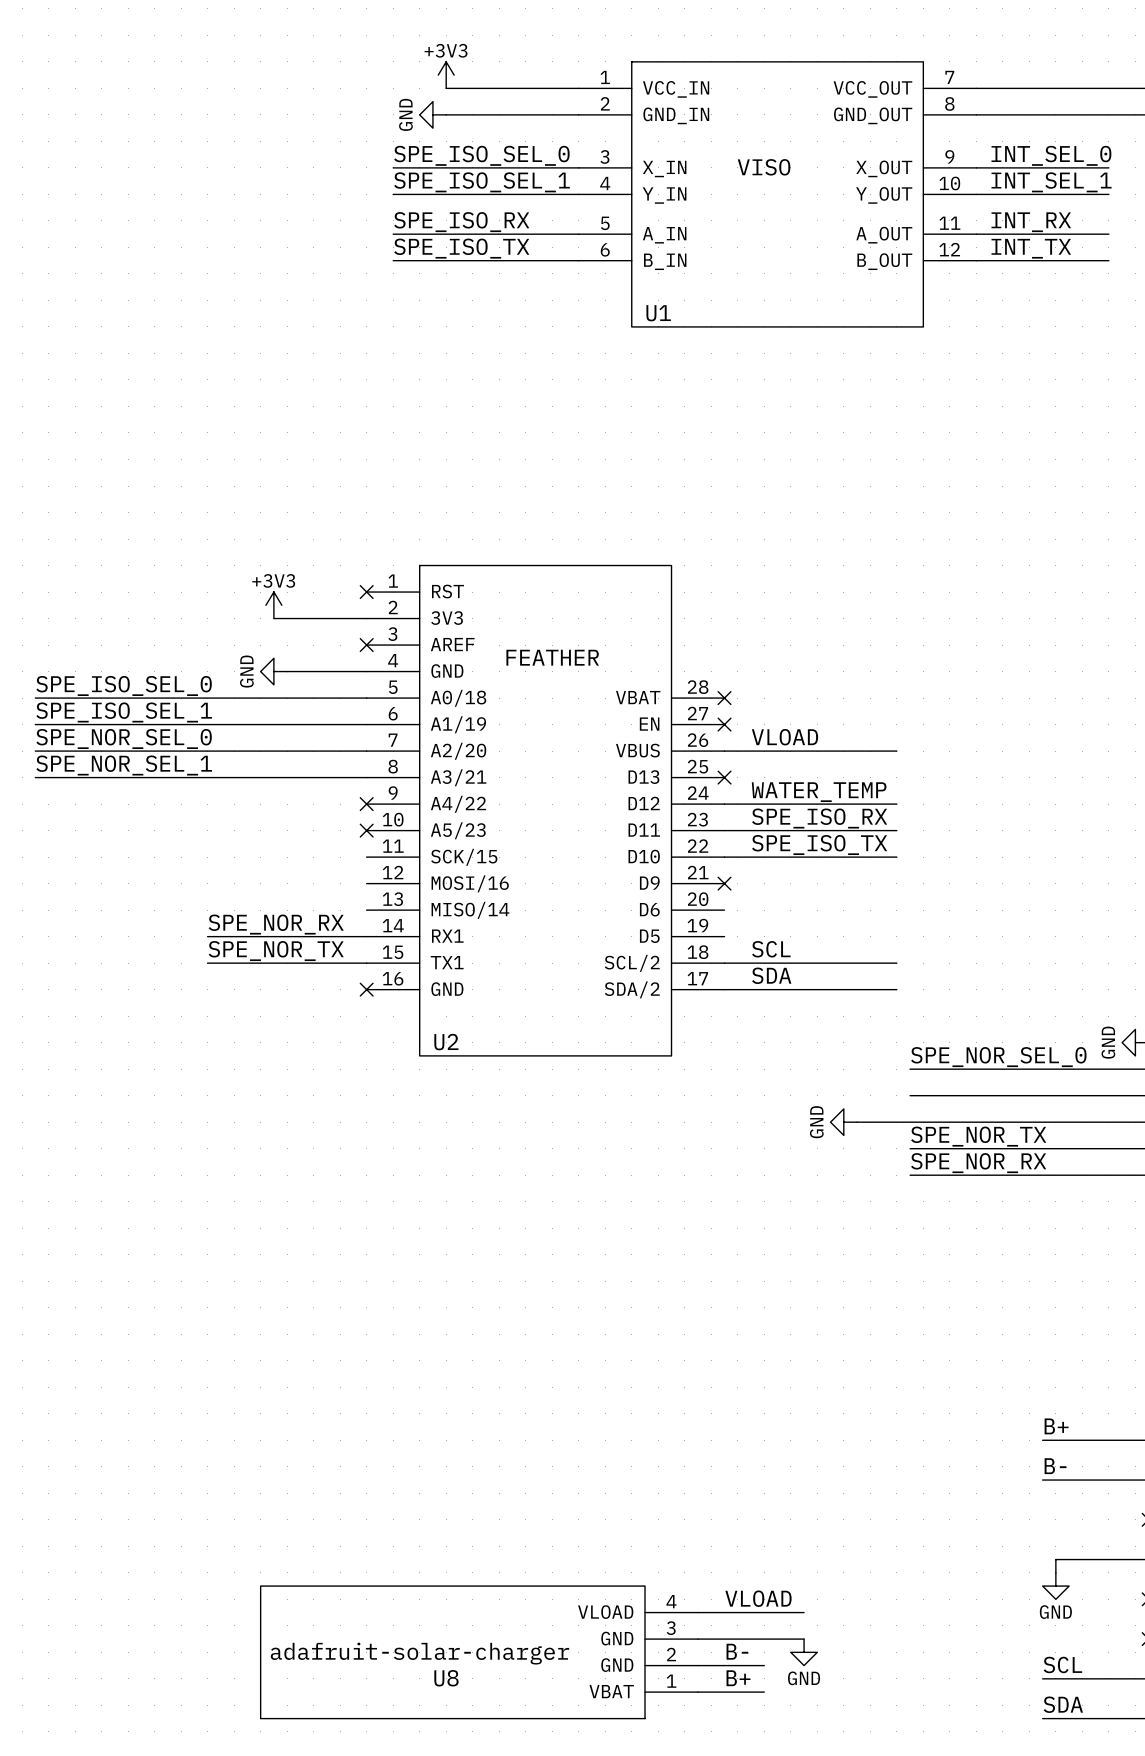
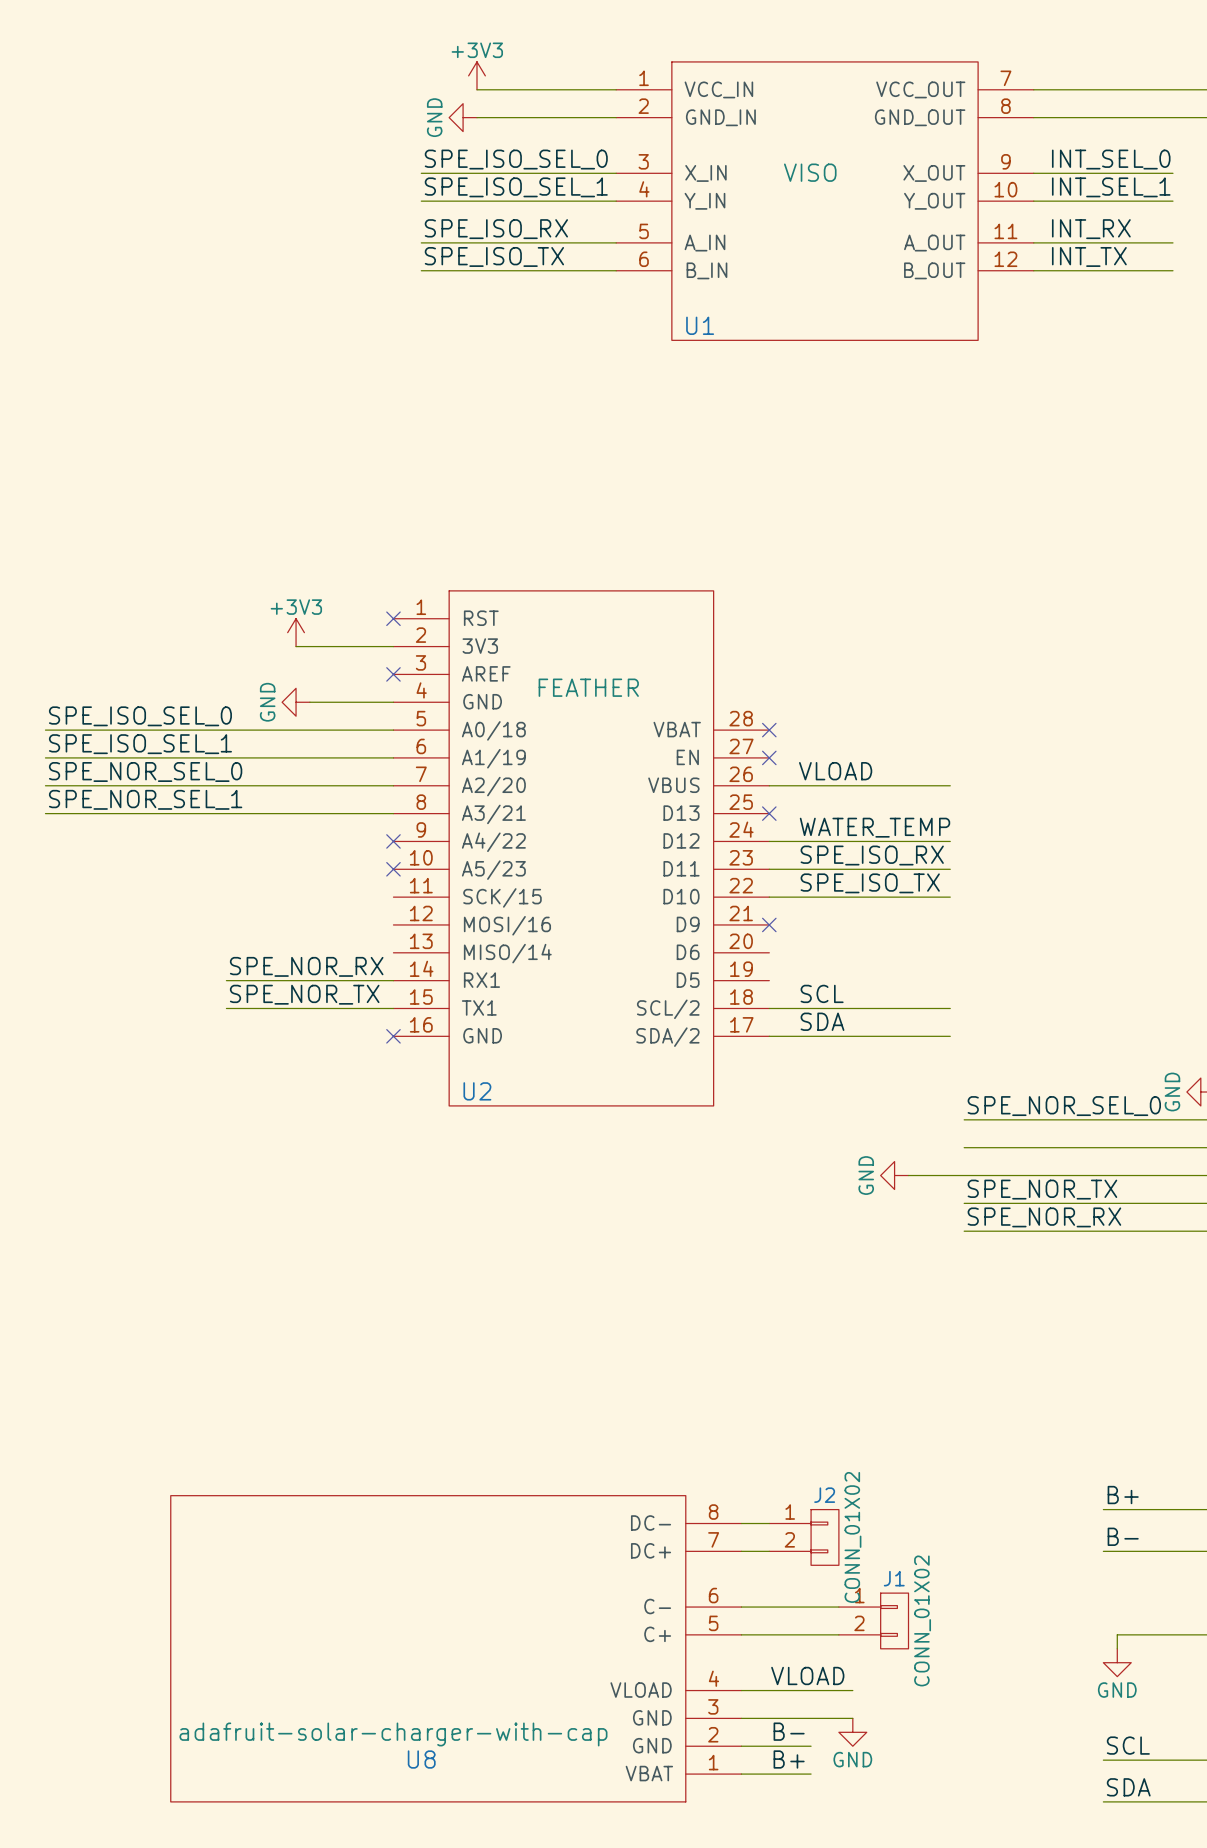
wire: none -> (741, 1523) (769, 1523)
J2: none -> CONN_01X02 (804, 1537)
wire: none -> (741, 1551) (769, 1551)
wire: none -> (741, 1607) (838, 1607)
J1: none -> CONN_01X02 (873, 1620)
wire: none -> (741, 1634) (838, 1634)
U8 symbol: [260, 1586, 699, 1719] -> [170, 1495, 742, 1802]
U8 value: adafruit-solar-charger (419, 1653) -> adafruit-solar-charger-with-cap (393, 1734)
U8 name position: U8 (446, 1678) -> U8 (421, 1759)

